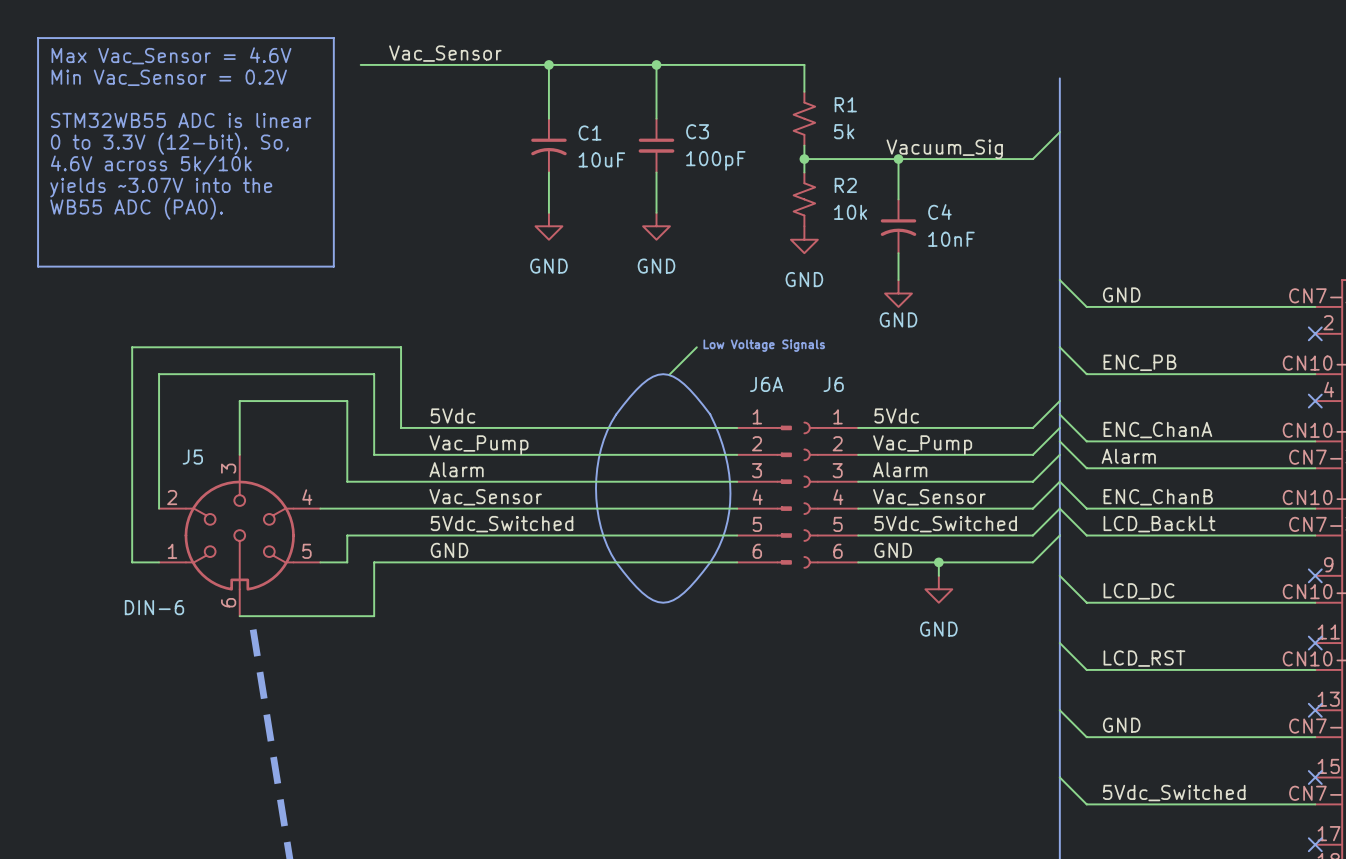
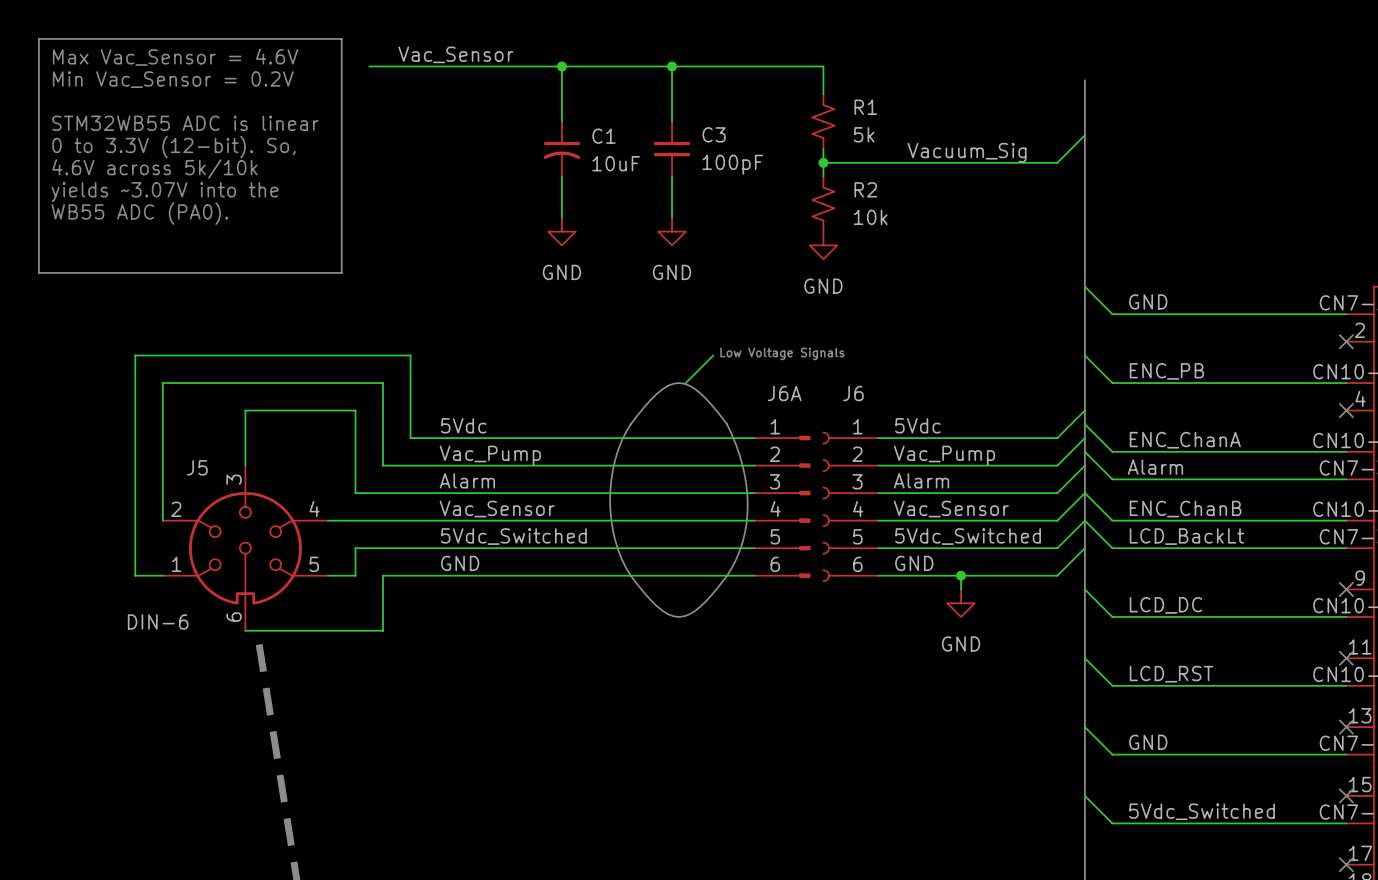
wire: (898, 159) (898, 199) -> none
junction: (898, 159) -> none
C4: 10nF (898, 226) -> none
wire: (898, 253) (898, 280) -> none
power symbol: GND (898, 293) -> none

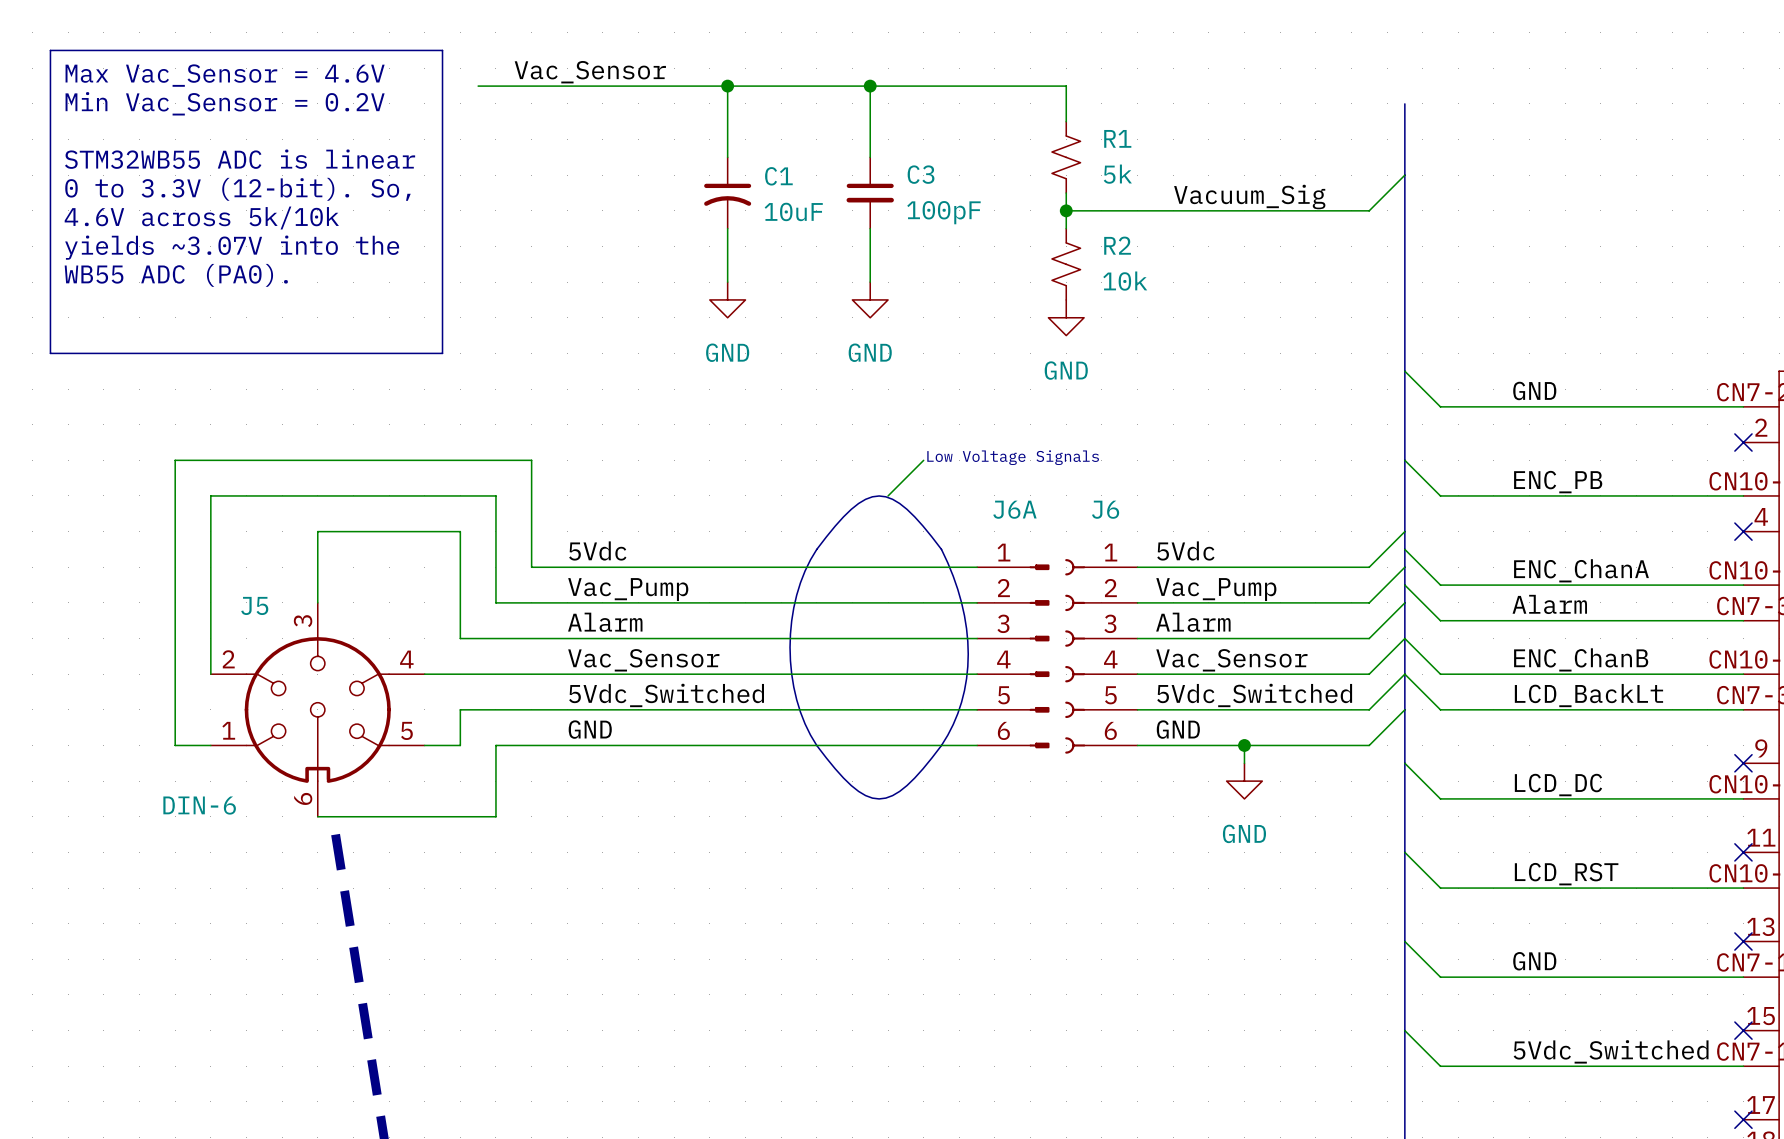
label position: GND (1148, 301) -> GND (1534, 390)
label position: ENC_PB (1166, 371) -> ENC_PB (1558, 482)
label position: ENC_ChanA (1185, 440) -> ENC_ChanA (1581, 570)
label position: Alarm (1155, 467) -> Alarm (1549, 604)
label position: ENC_ChanB (1185, 509) -> ENC_ChanB (1581, 659)
label position: LCD_BackLt (1186, 536) -> LCD_BackLt (1588, 695)
label position: LCD_DC (1165, 605) -> LCD_DC (1558, 785)
label position: LCD_RST (1171, 674) -> LCD_RST (1566, 874)
label position: GND (1148, 742) -> GND (1534, 961)
label position: 5Vdc_Switched (1202, 811) -> 5Vdc_Switched (1611, 1051)

